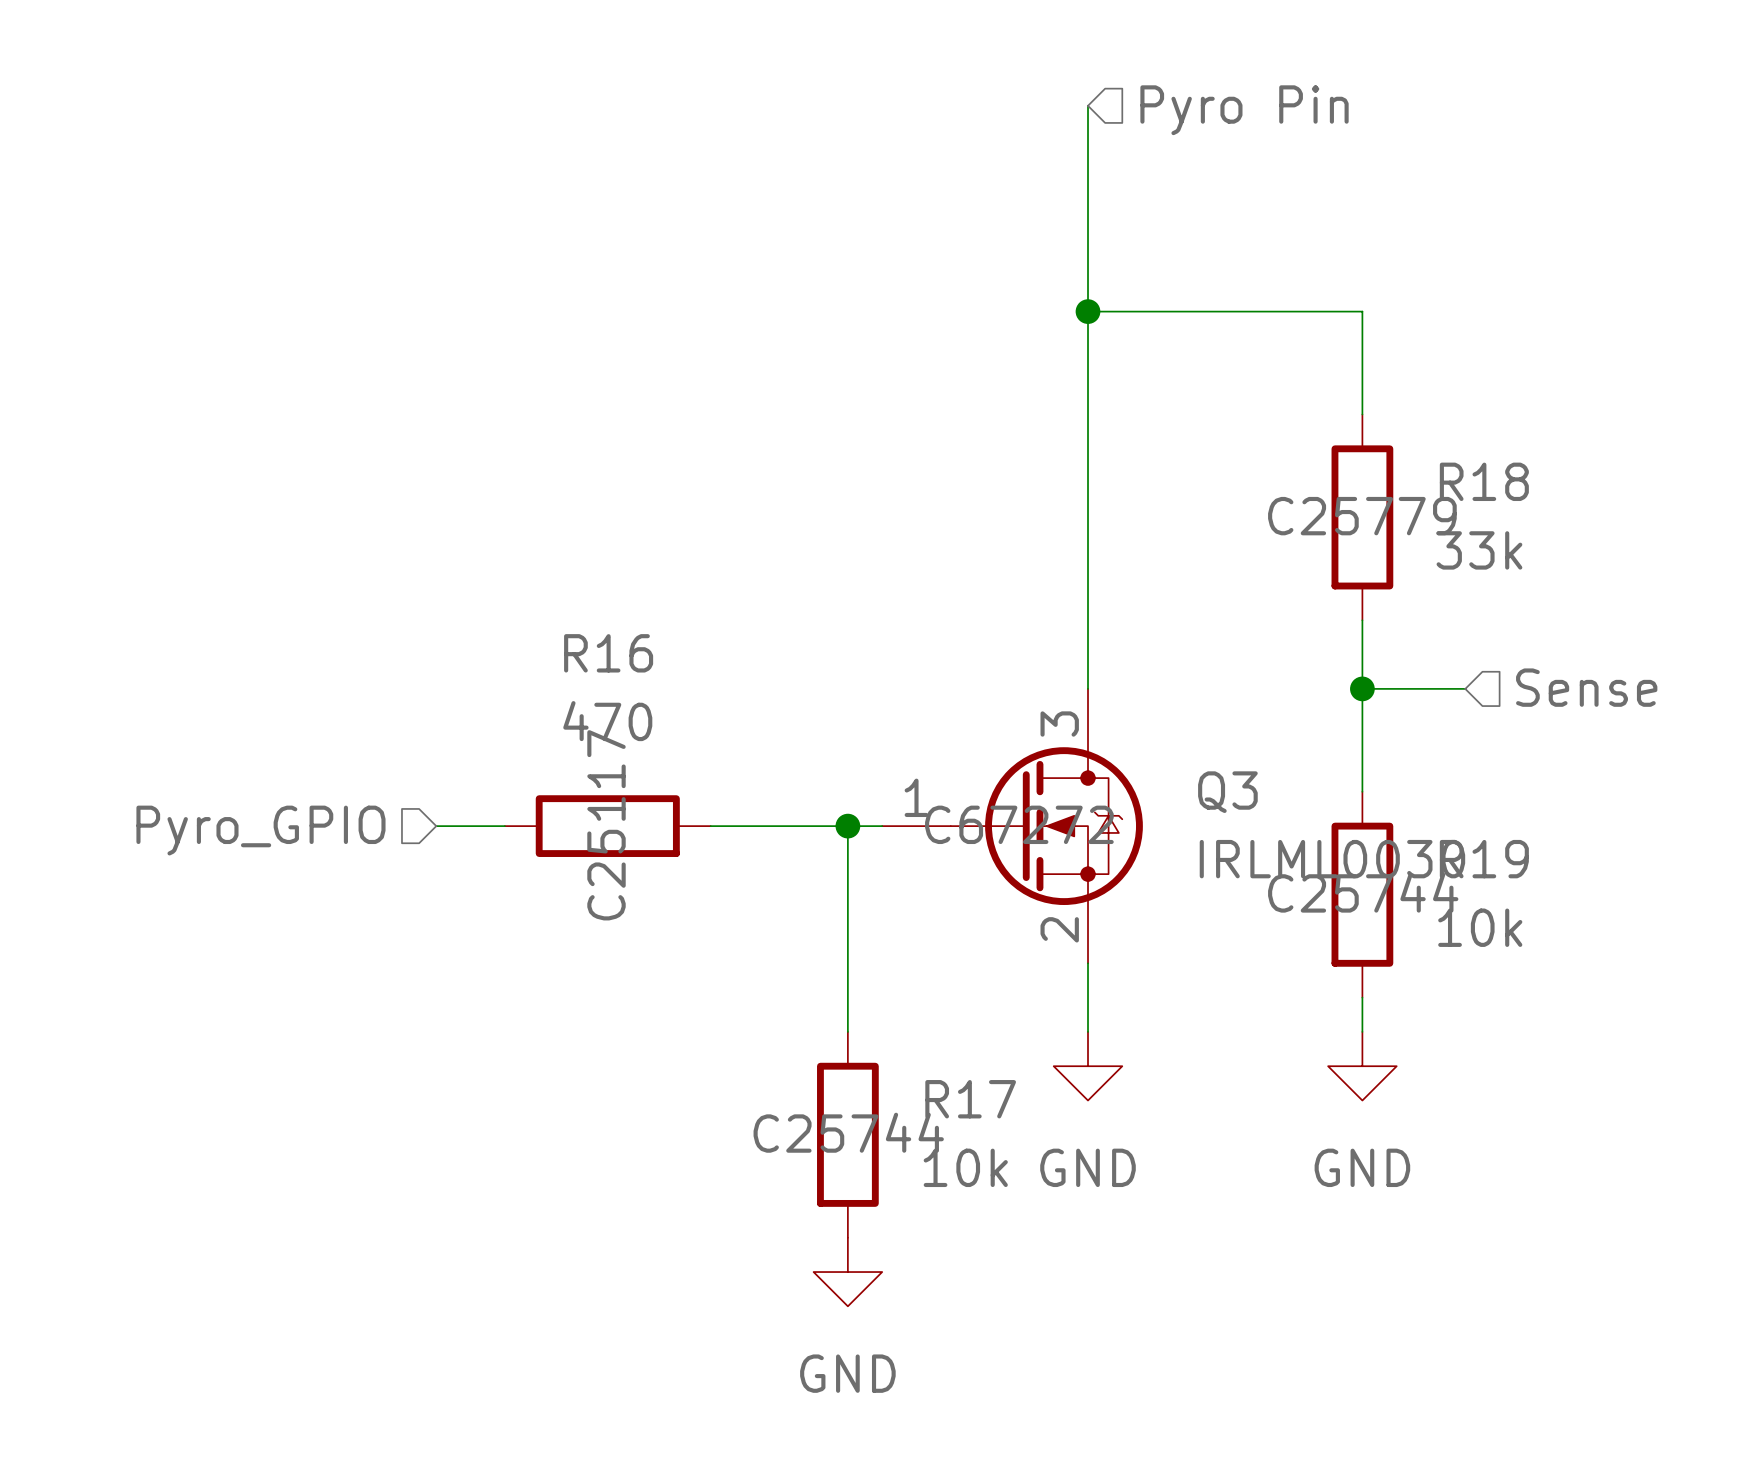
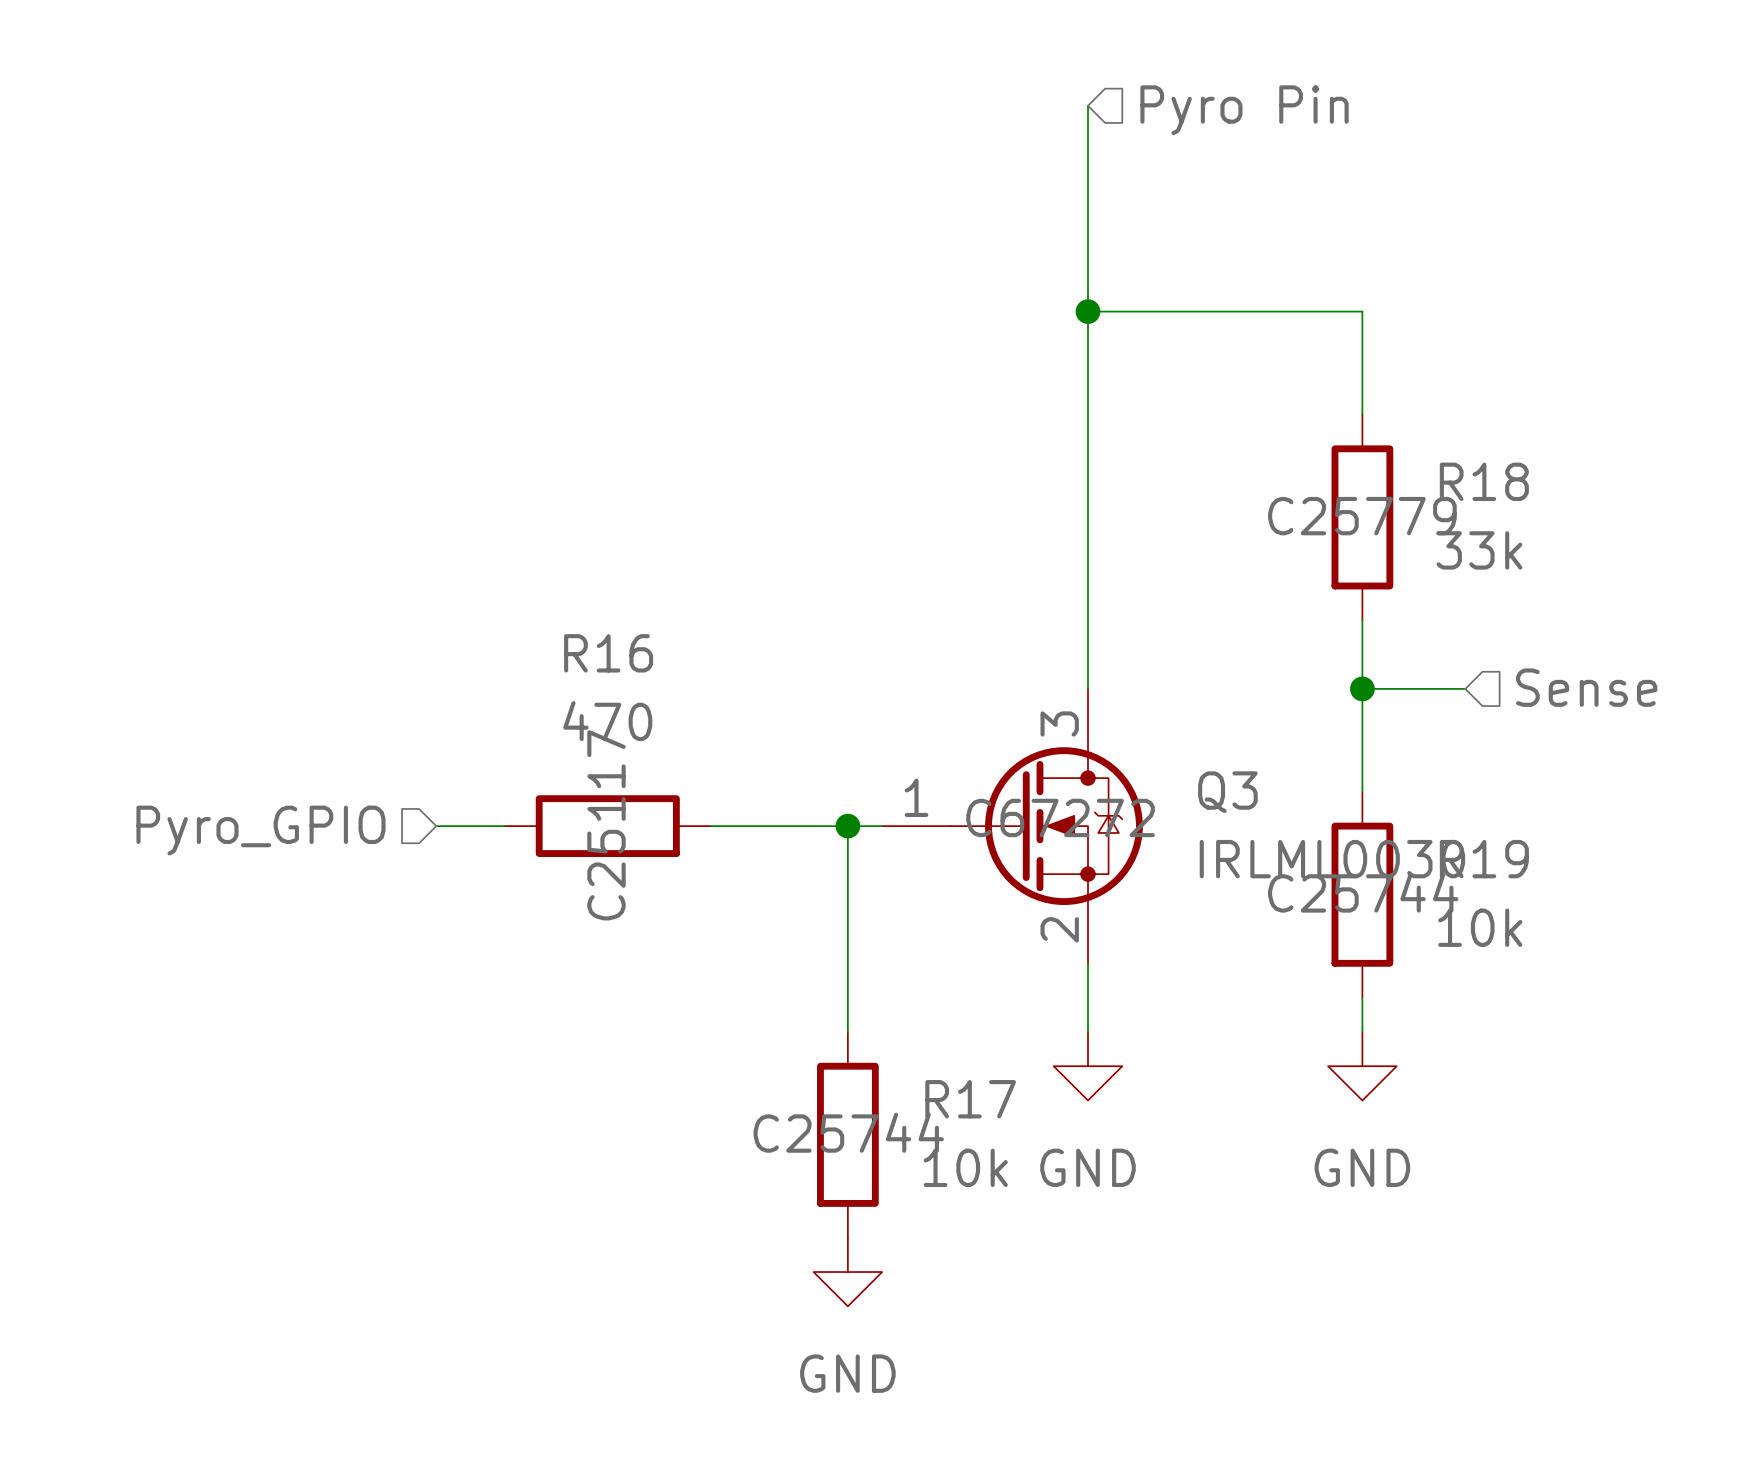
Q3 text position: C67272 (1019, 824) -> C67272 (1060, 817)

